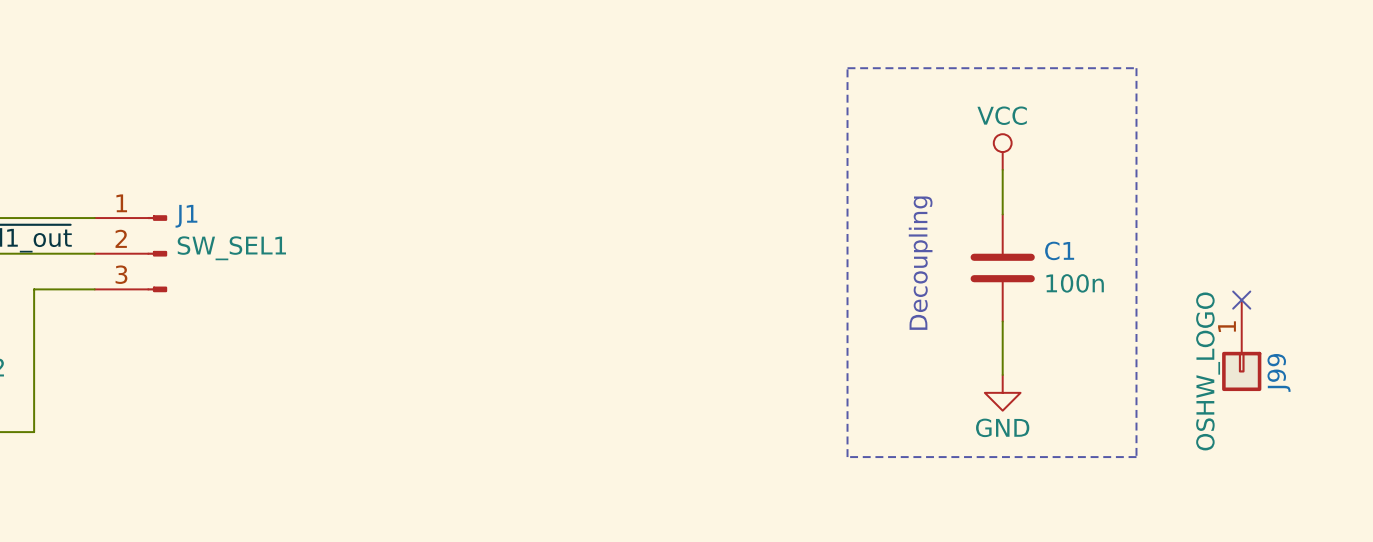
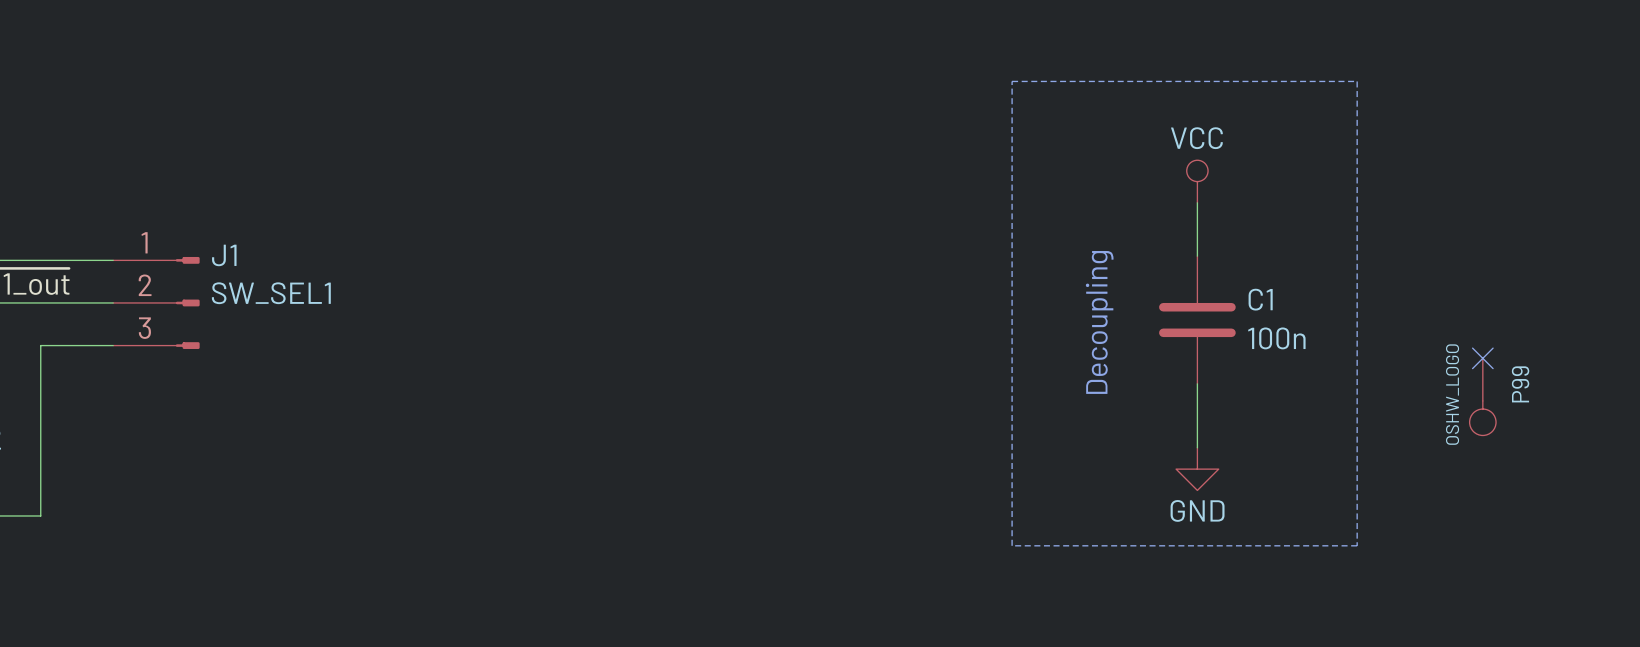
P99: none -> OSHW_LOGO (1482, 396)
J99: OSHW_LOGO (1241, 345) -> none

